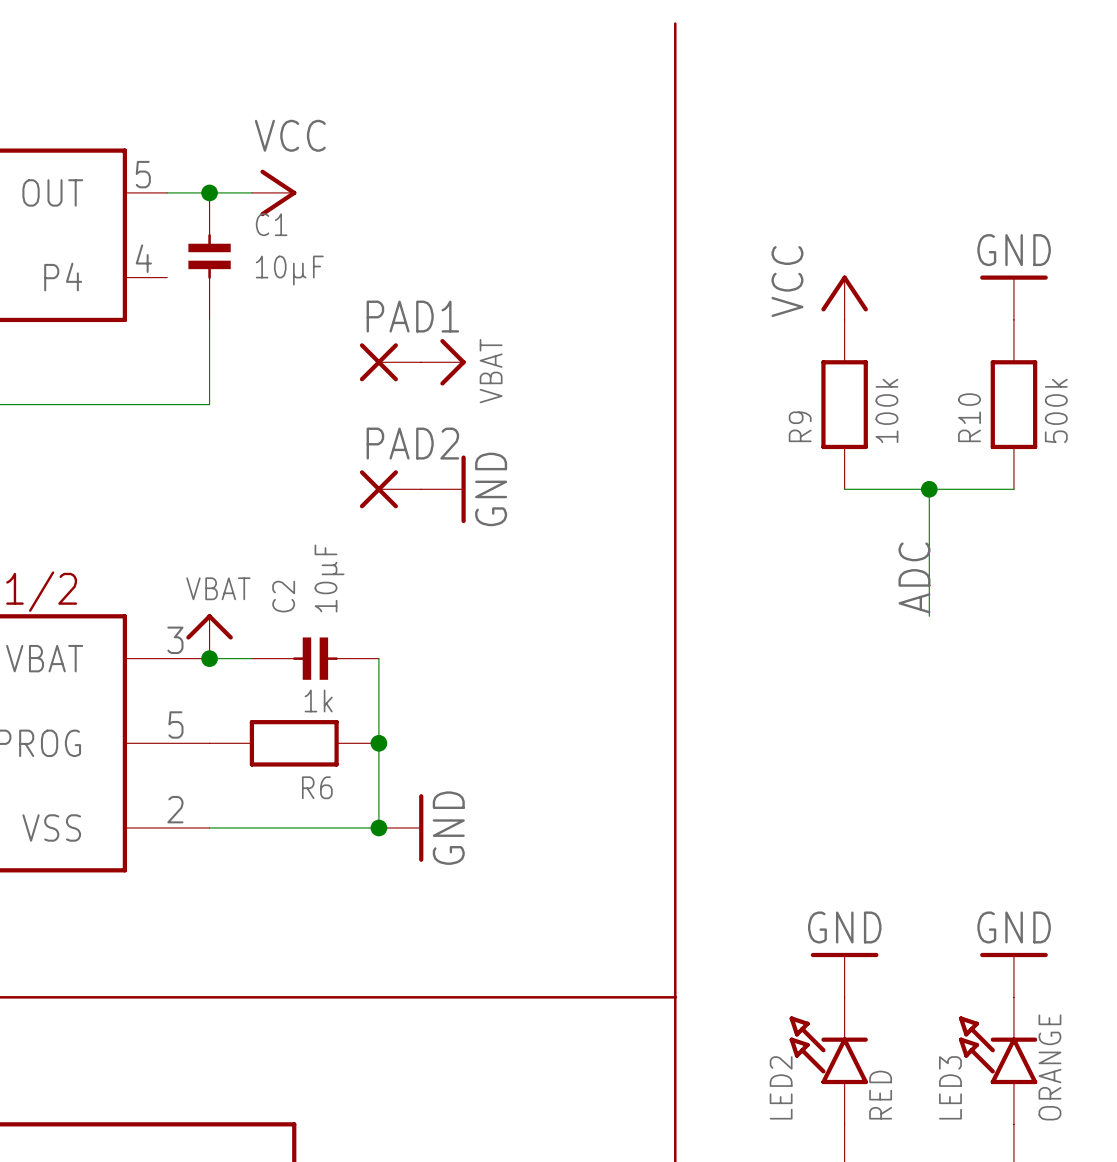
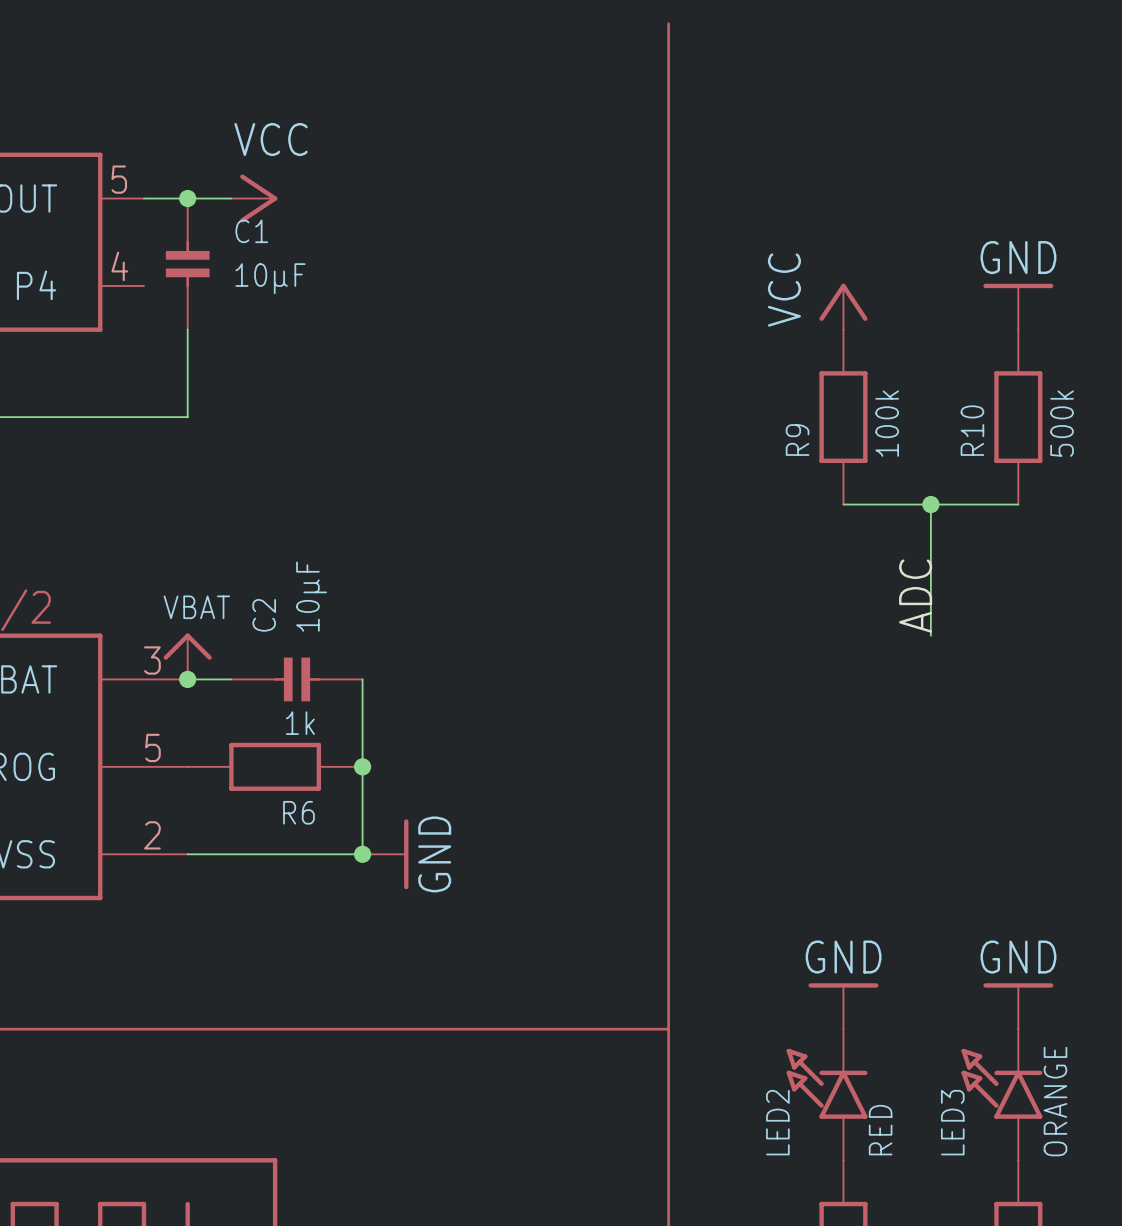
PAD1: (390, 362) -> none
power symbol: VBAT (443, 362) -> none
PAD2: (390, 489) -> none
power symbol: GND (443, 489) -> none

